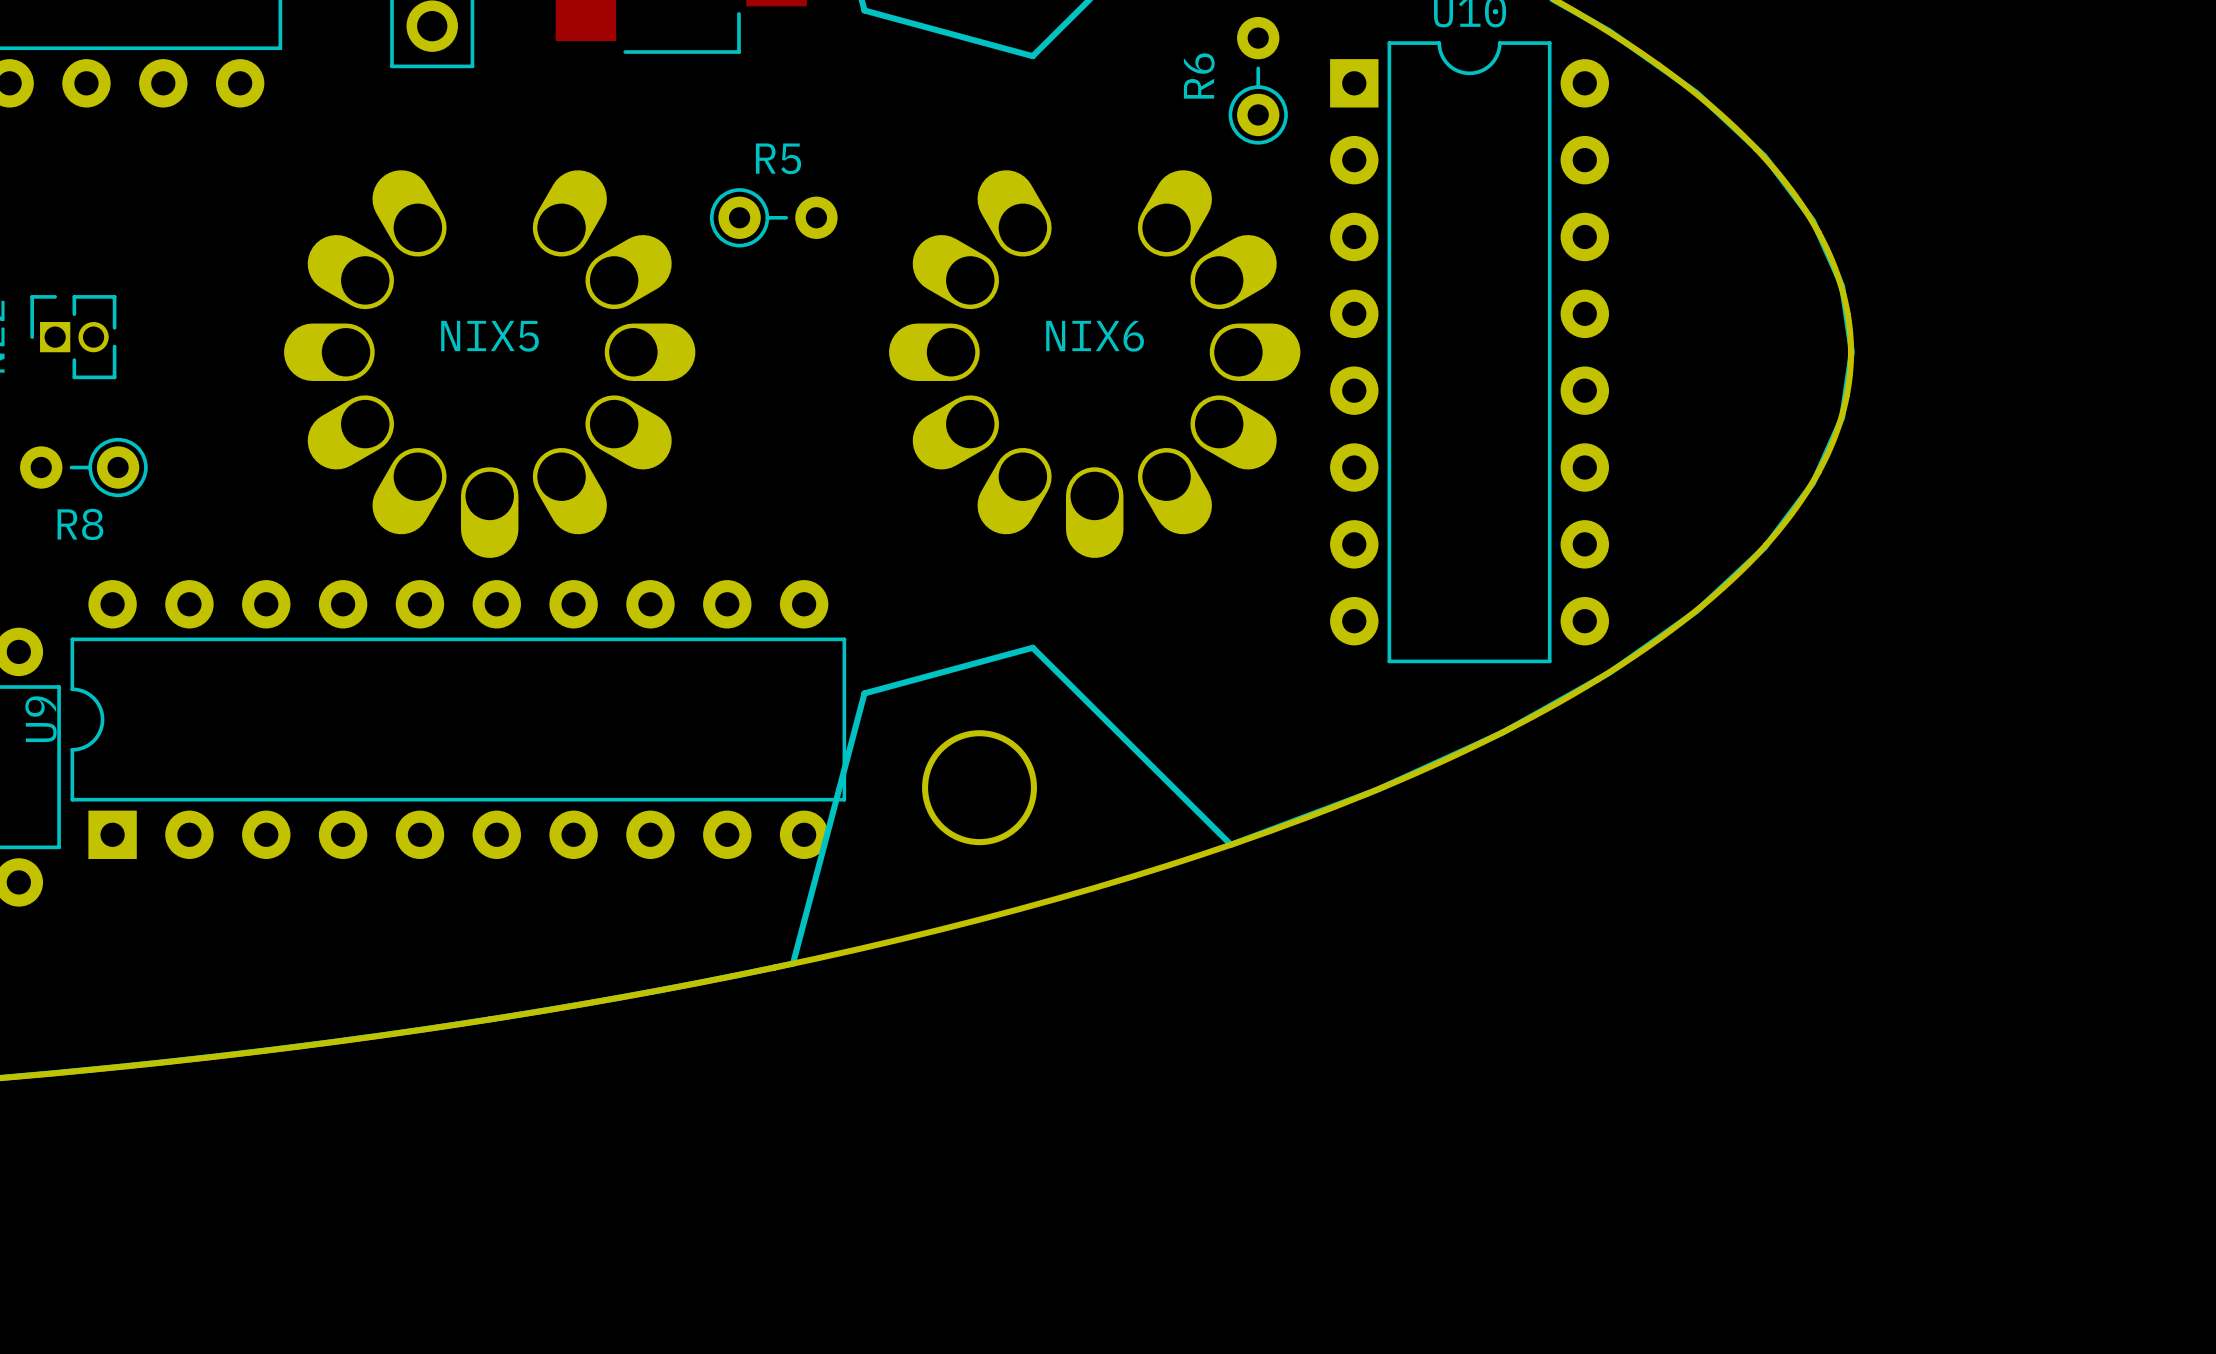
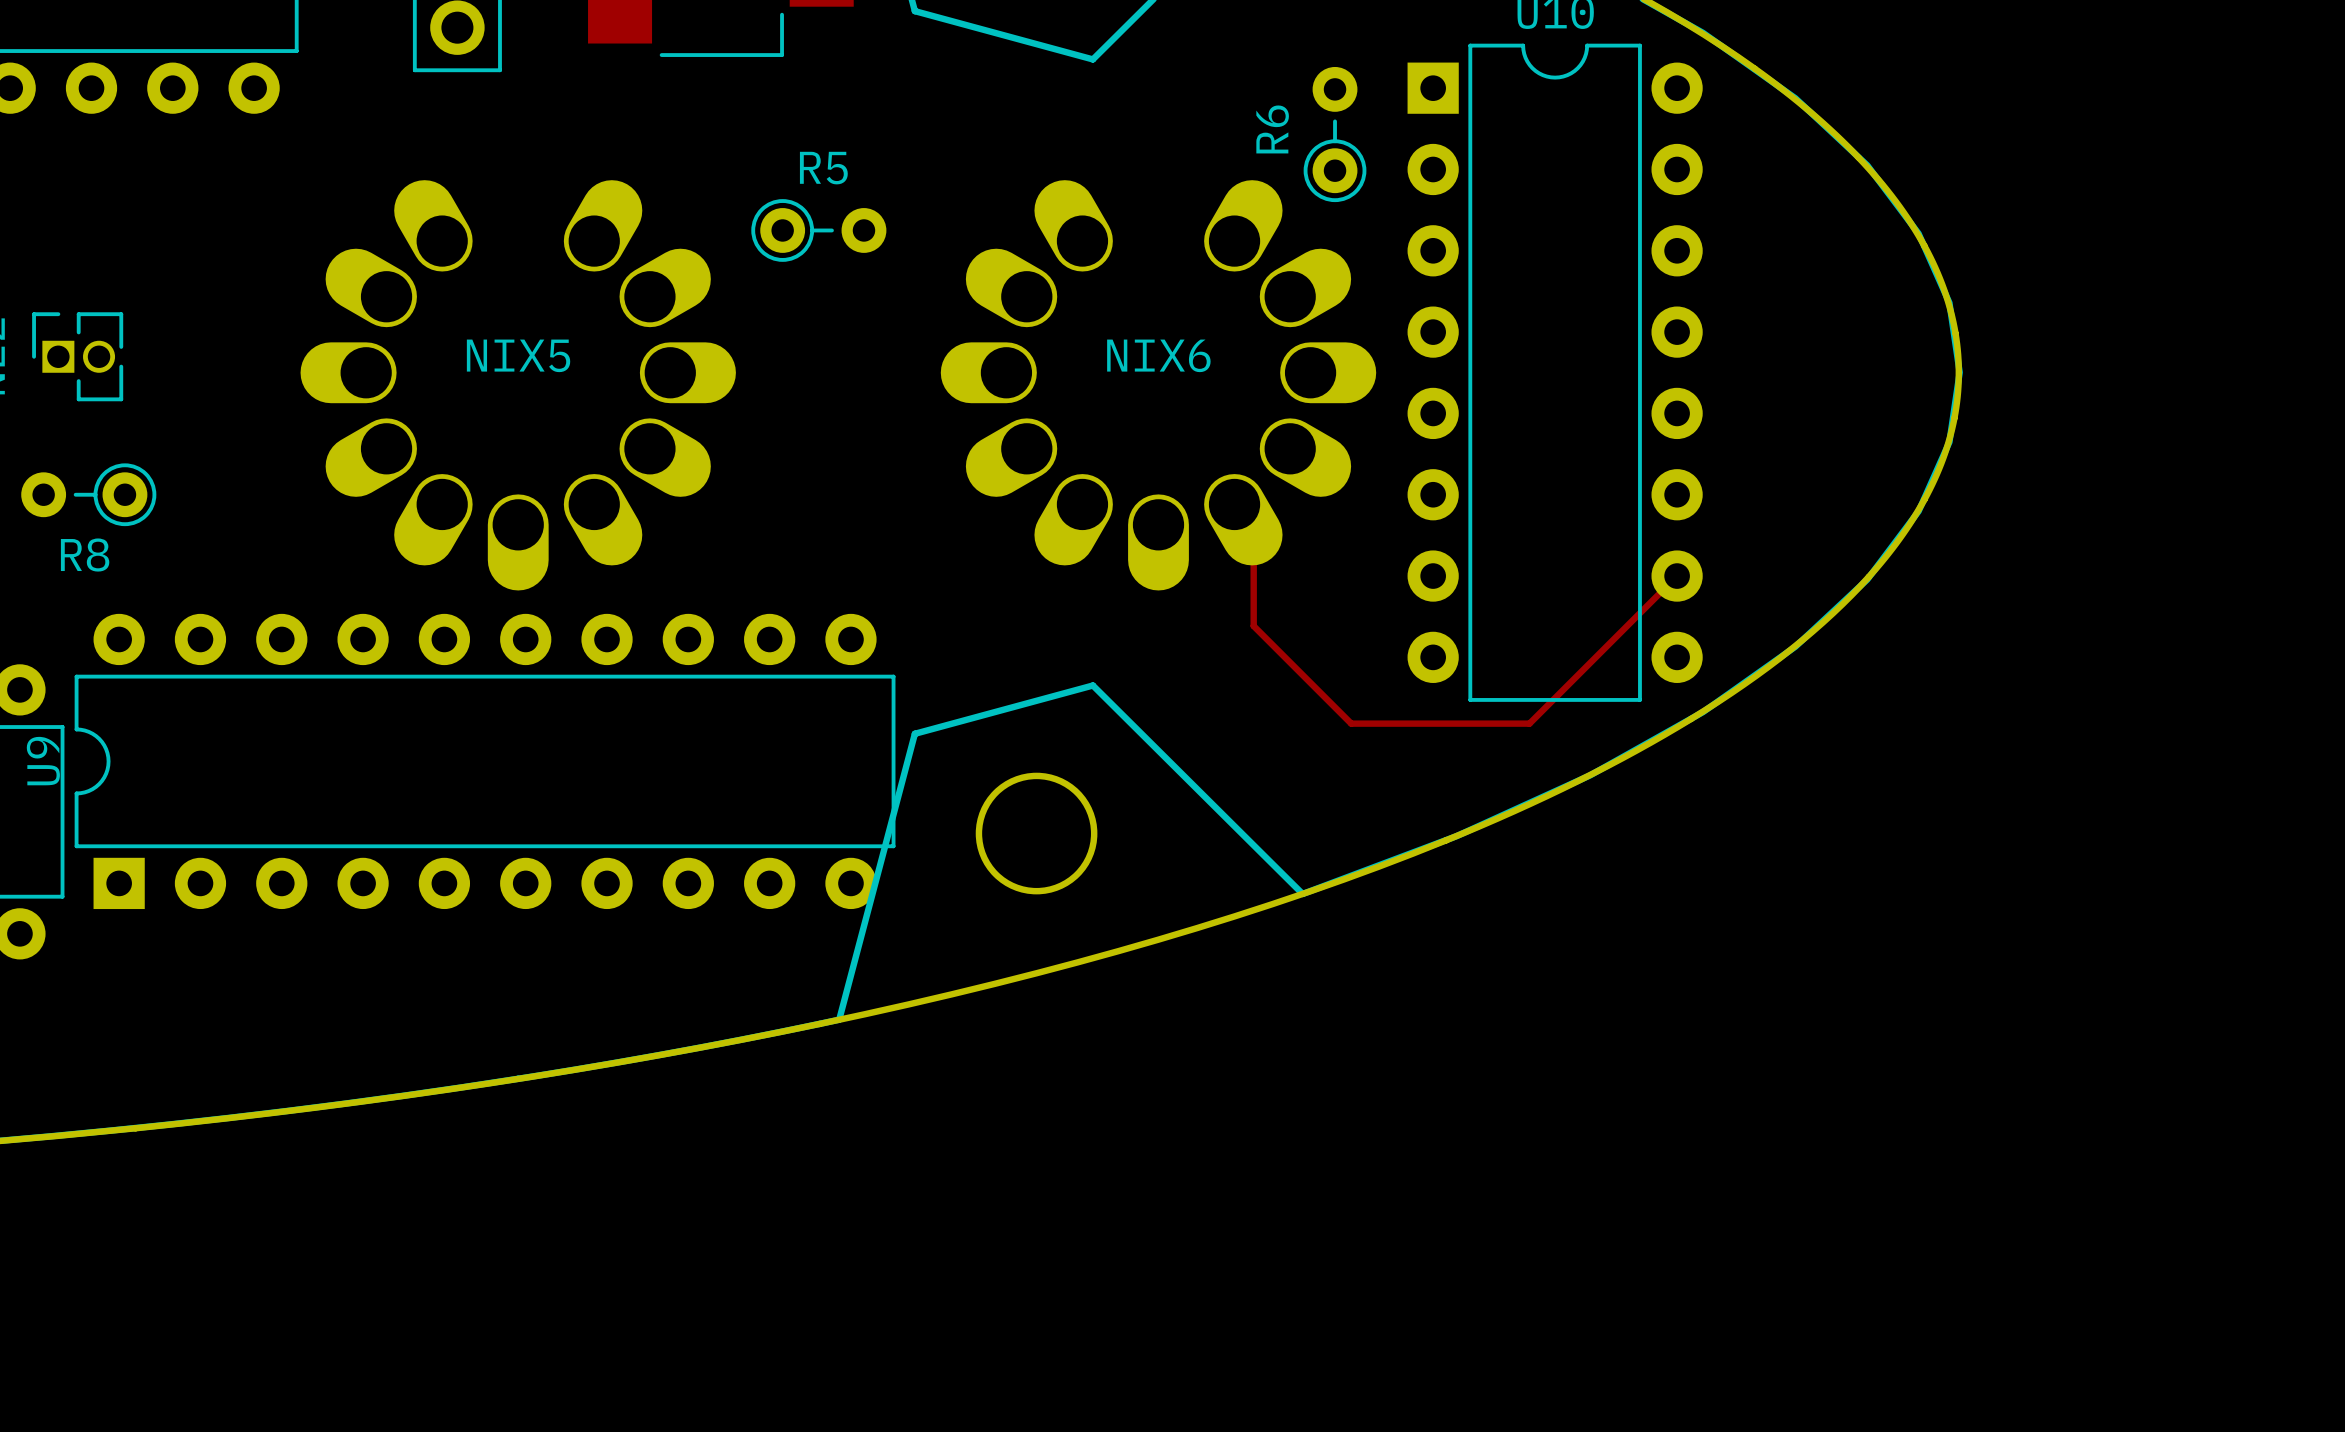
R6 position: (1258, 80) -> (1335, 134)
track: none -> (1234, 504) (1253, 523) (1253, 626) (1351, 723) (1529, 723) (1677, 576)

